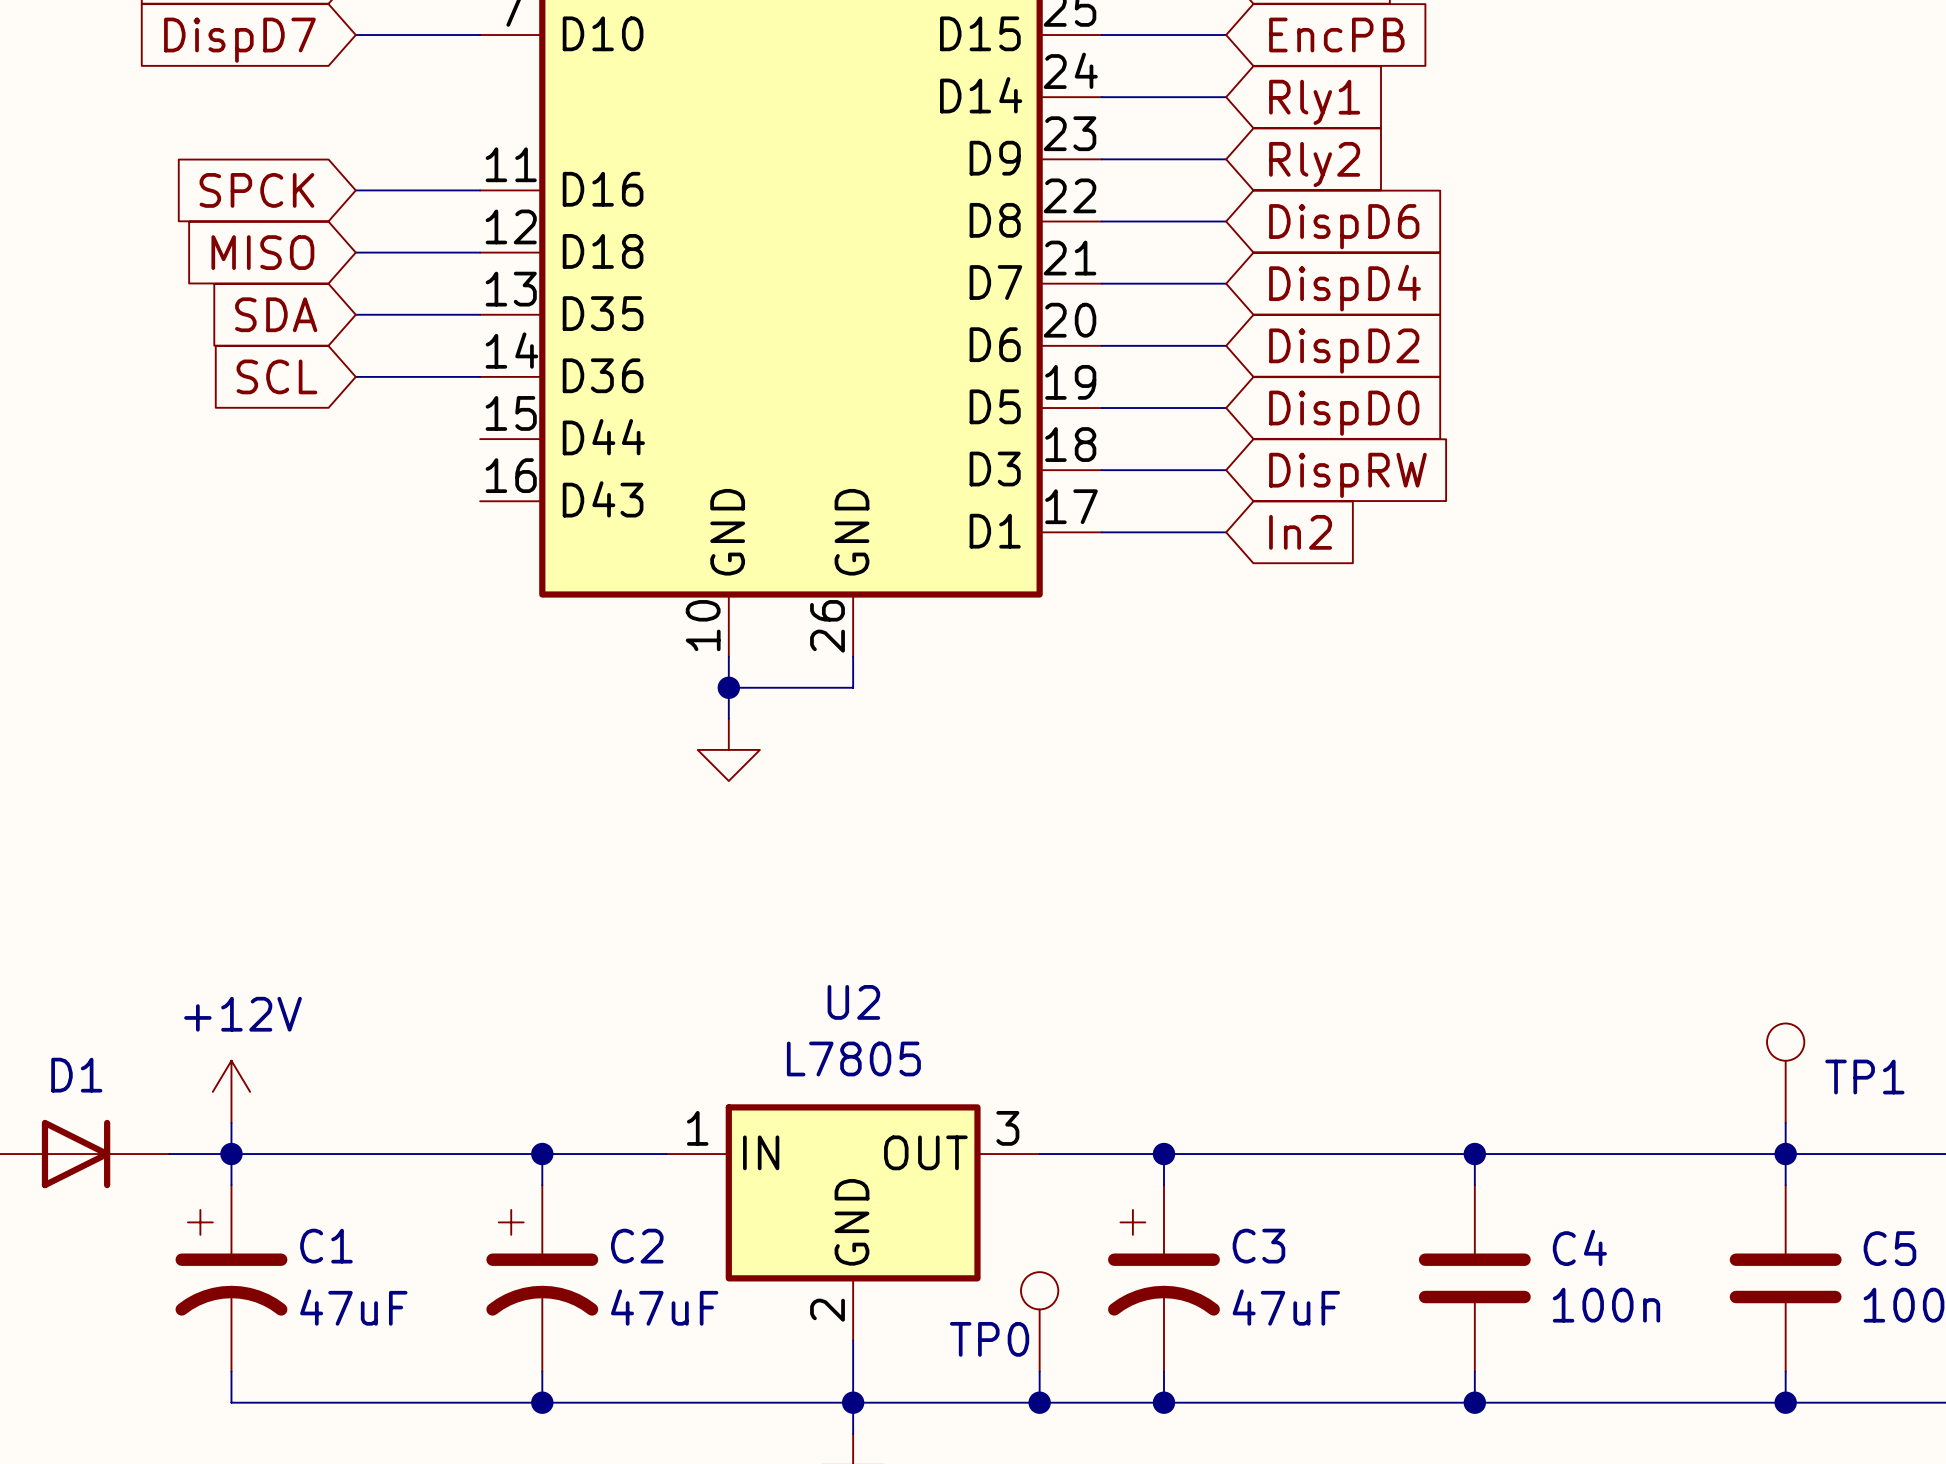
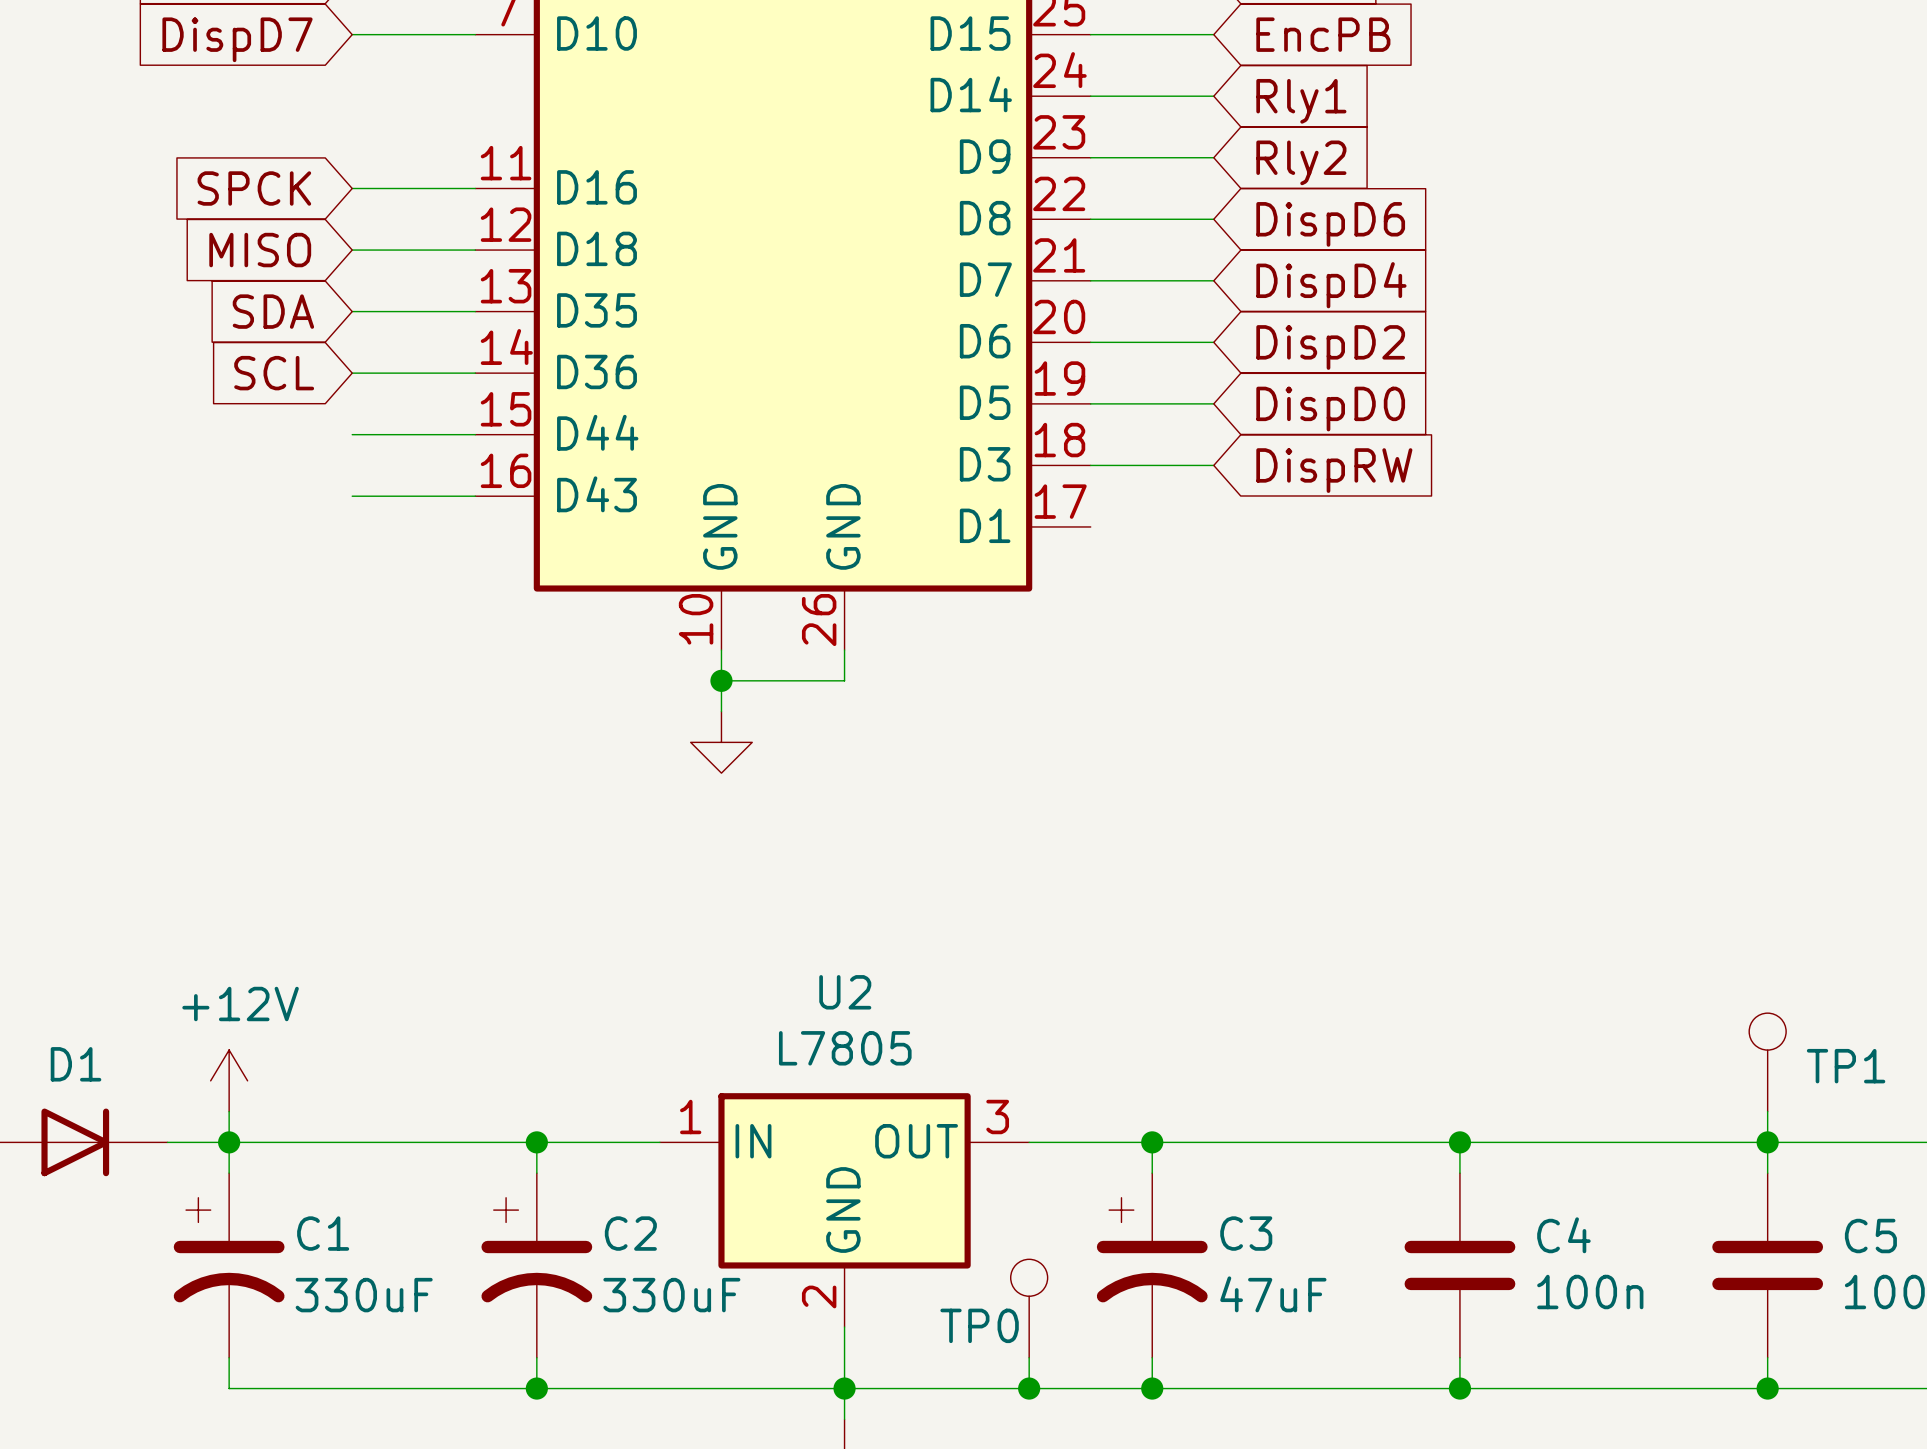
wire: none -> (352, 434) (475, 434)
wire: none -> (352, 496) (475, 496)
wire: (1101, 532) (1226, 532) -> none
global label: In2 (1300, 532) -> none
C1 value: 47uF (353, 1307) -> 330uF (364, 1295)
C2 value: 47uF (664, 1307) -> 330uF (671, 1295)

